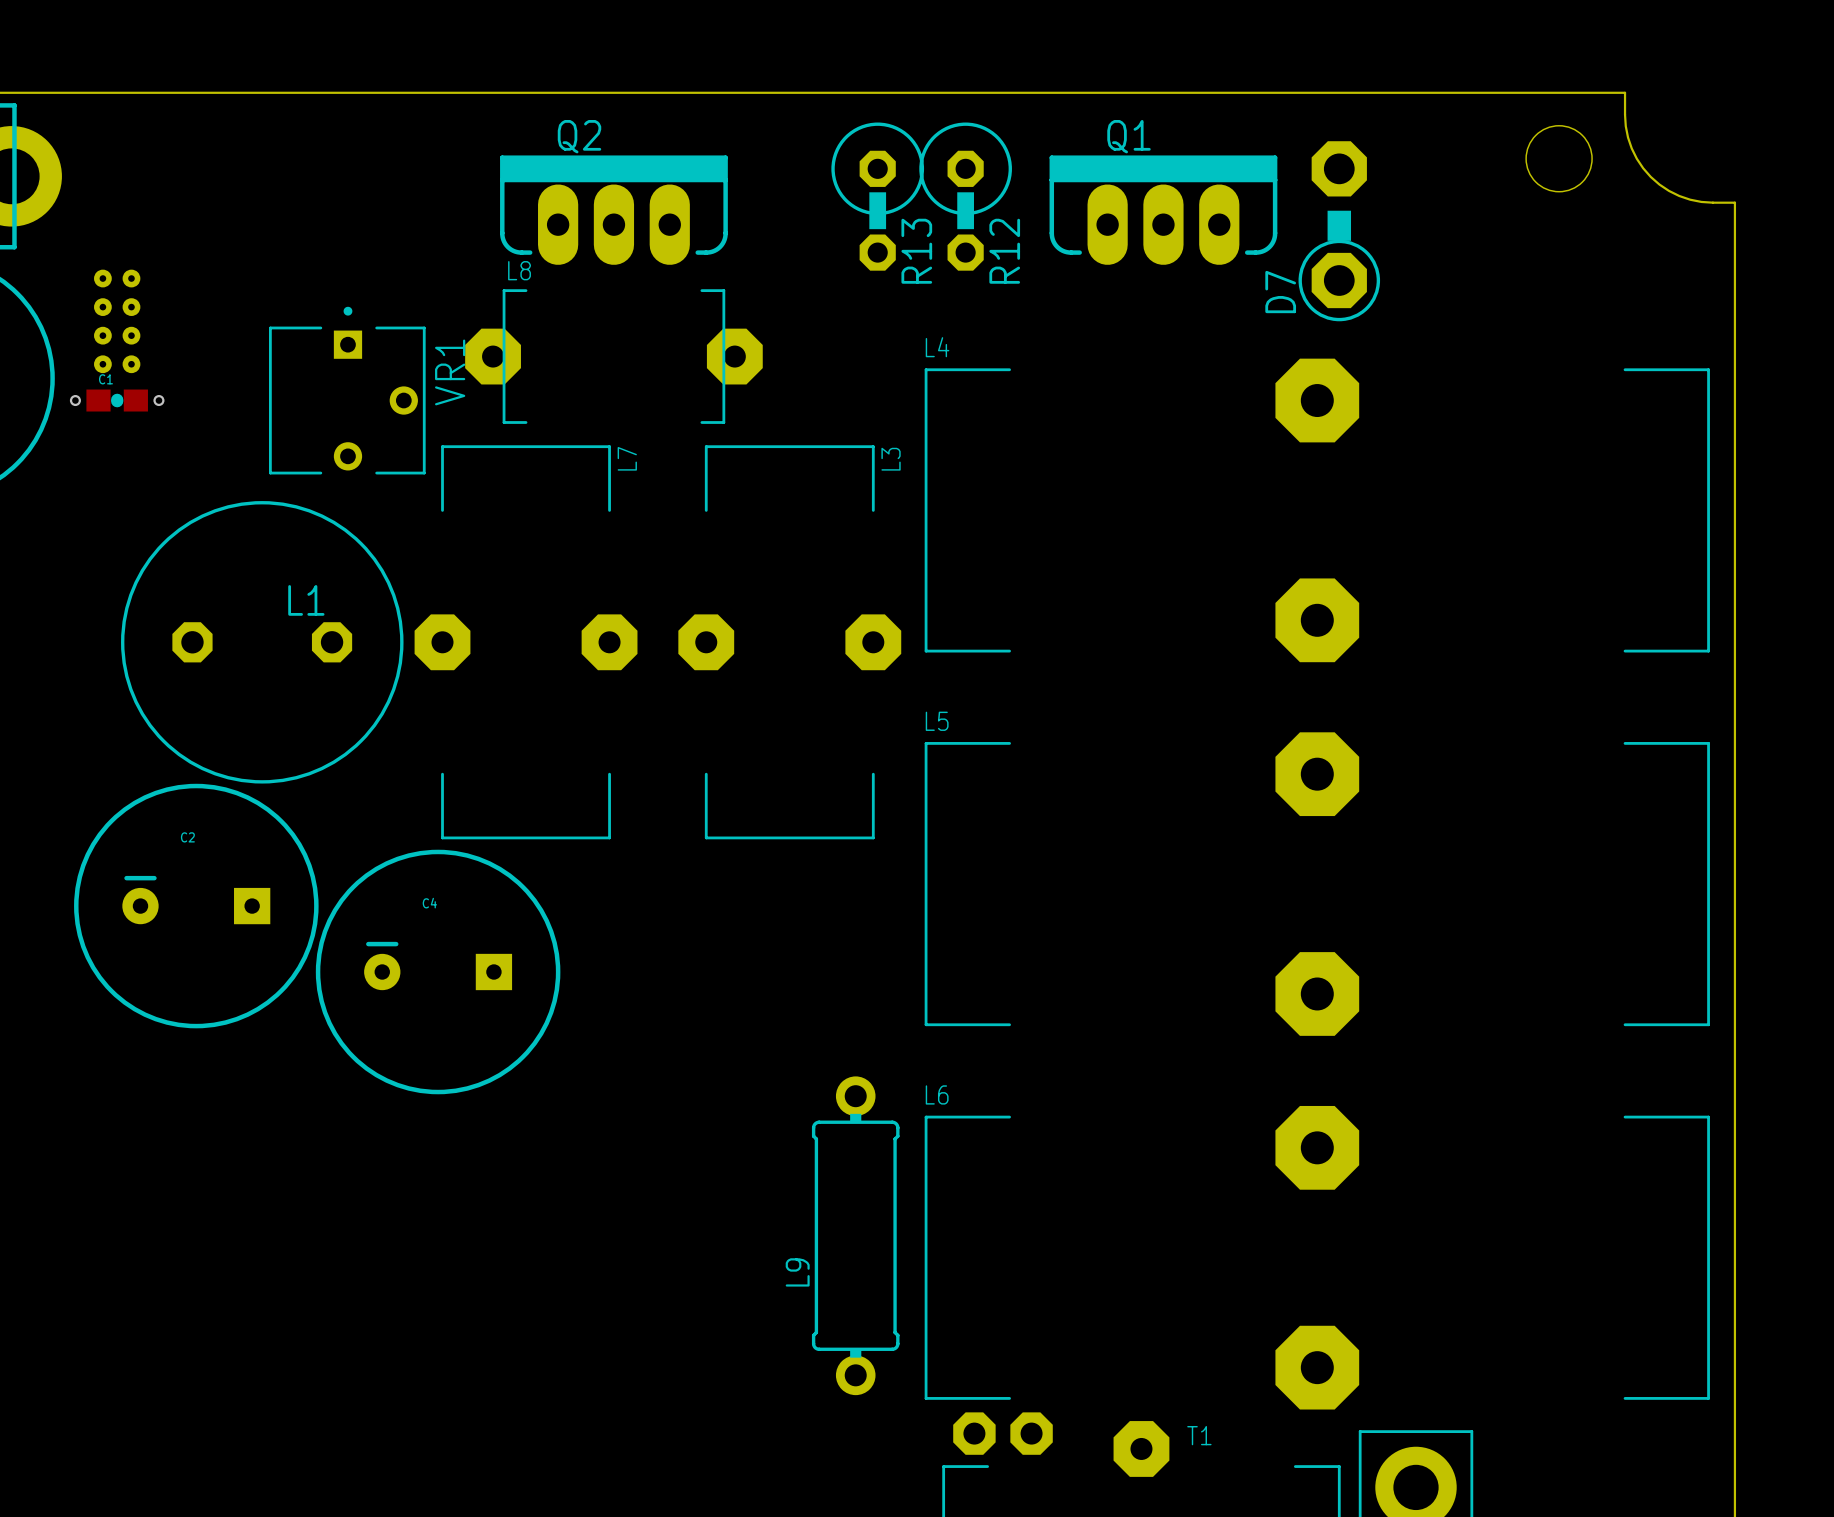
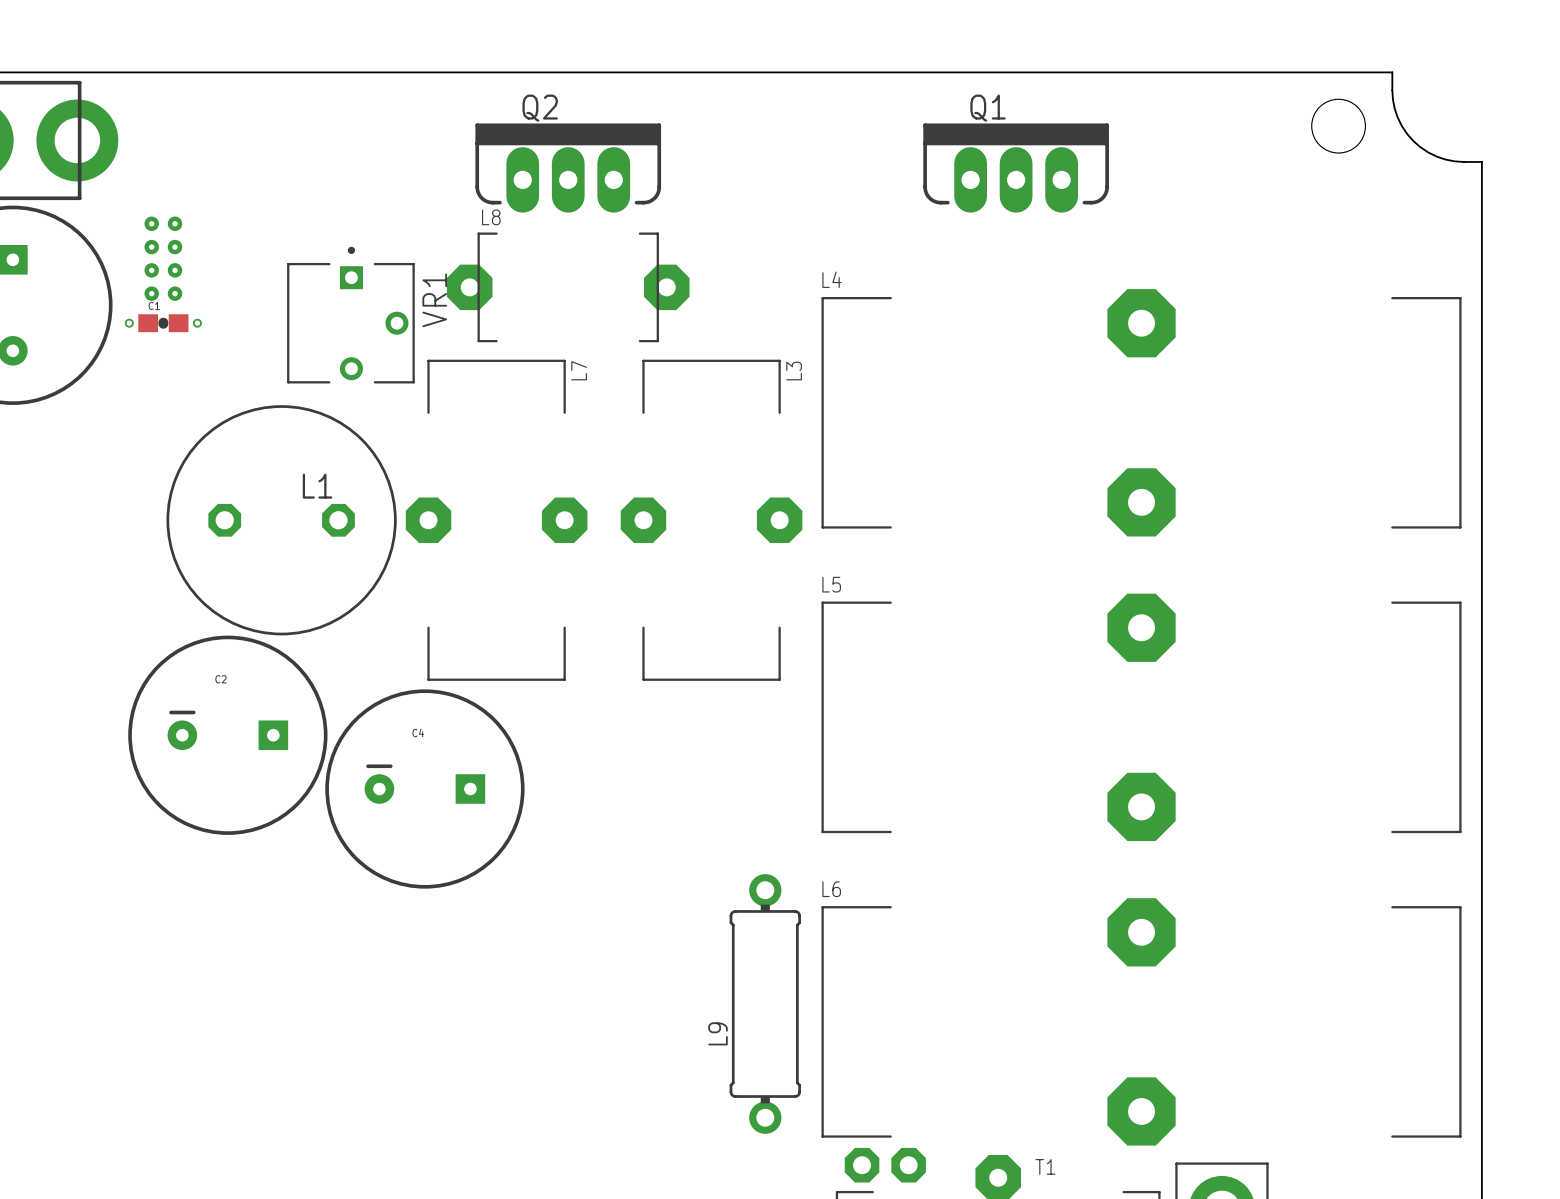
R13: (877, 196) -> none
R12: (965, 196) -> none
D7: (1339, 231) -> none

